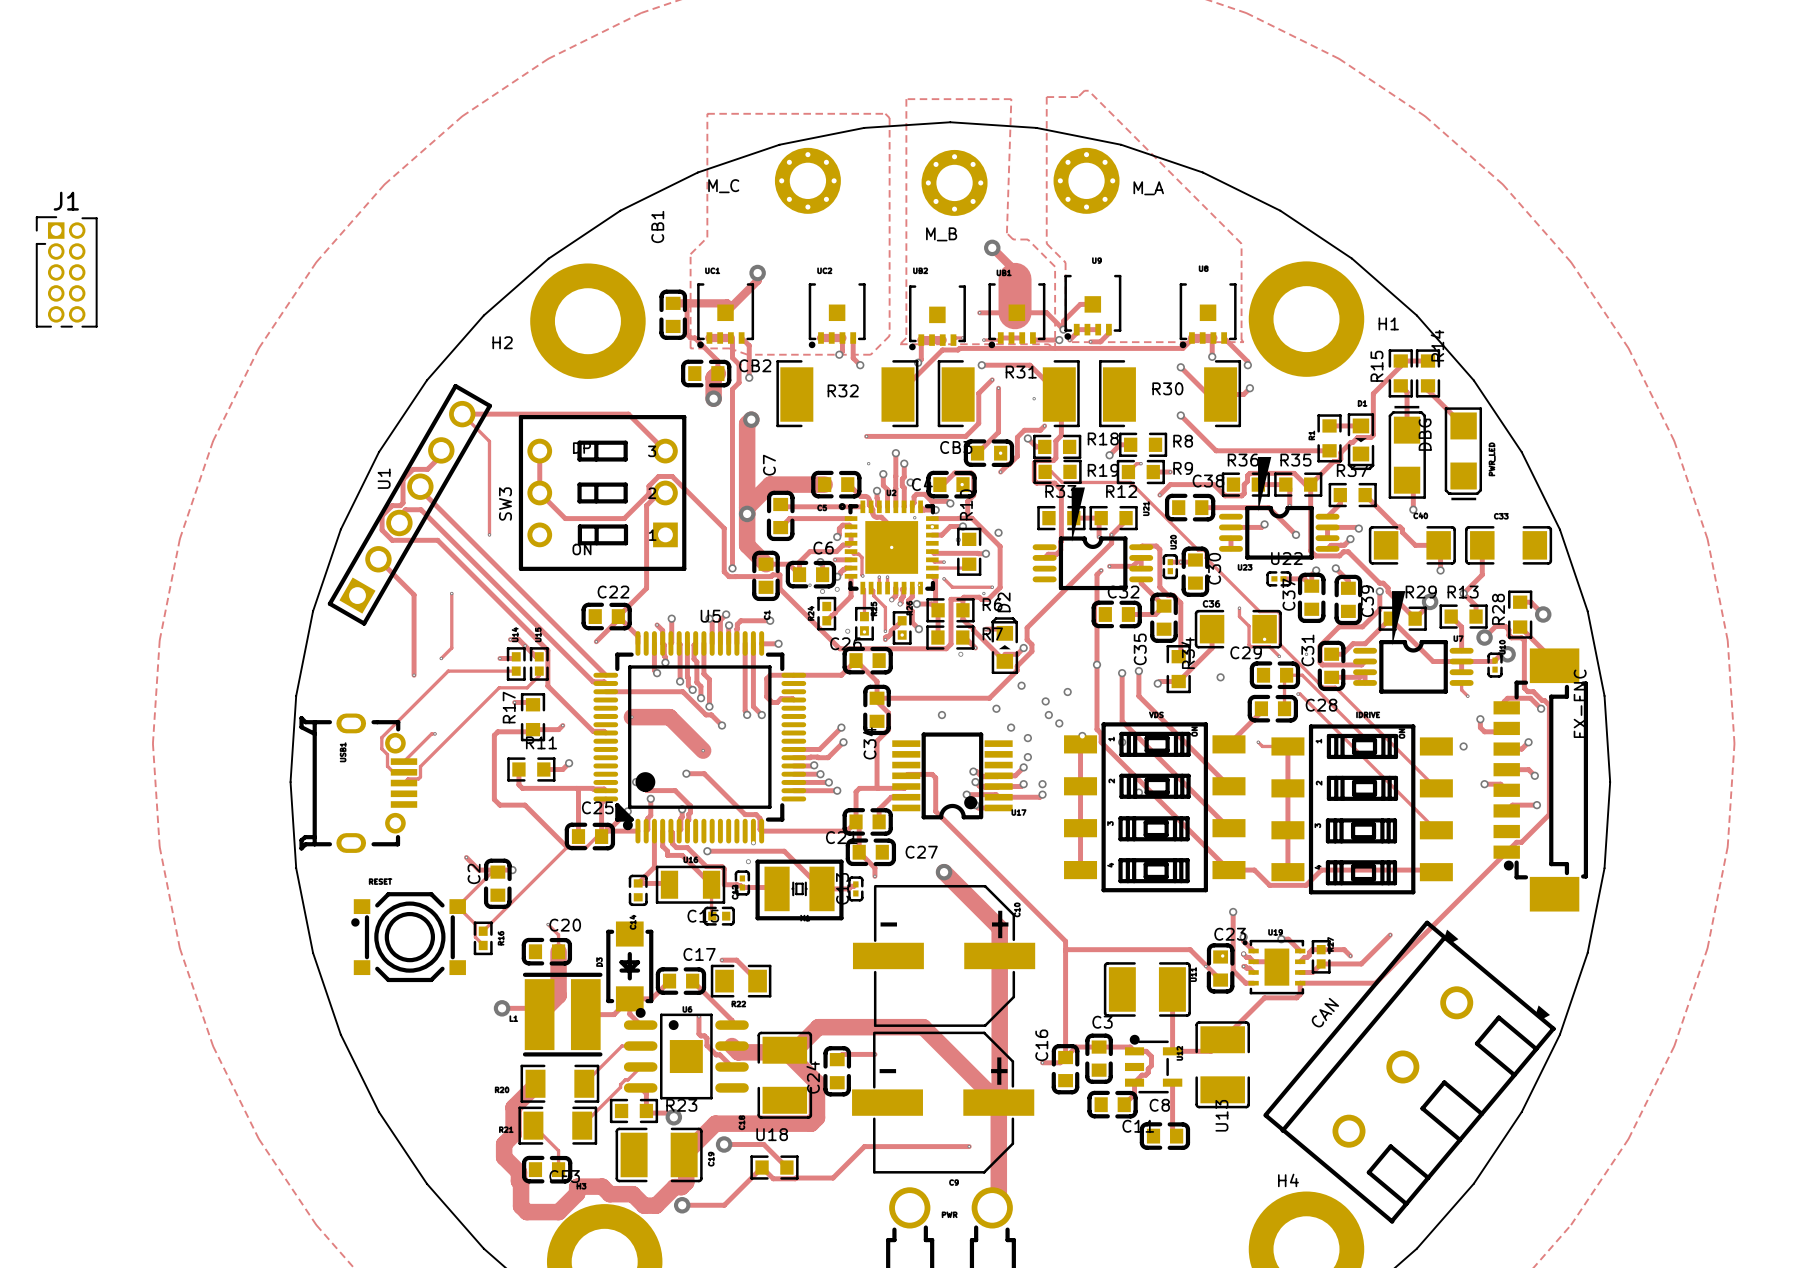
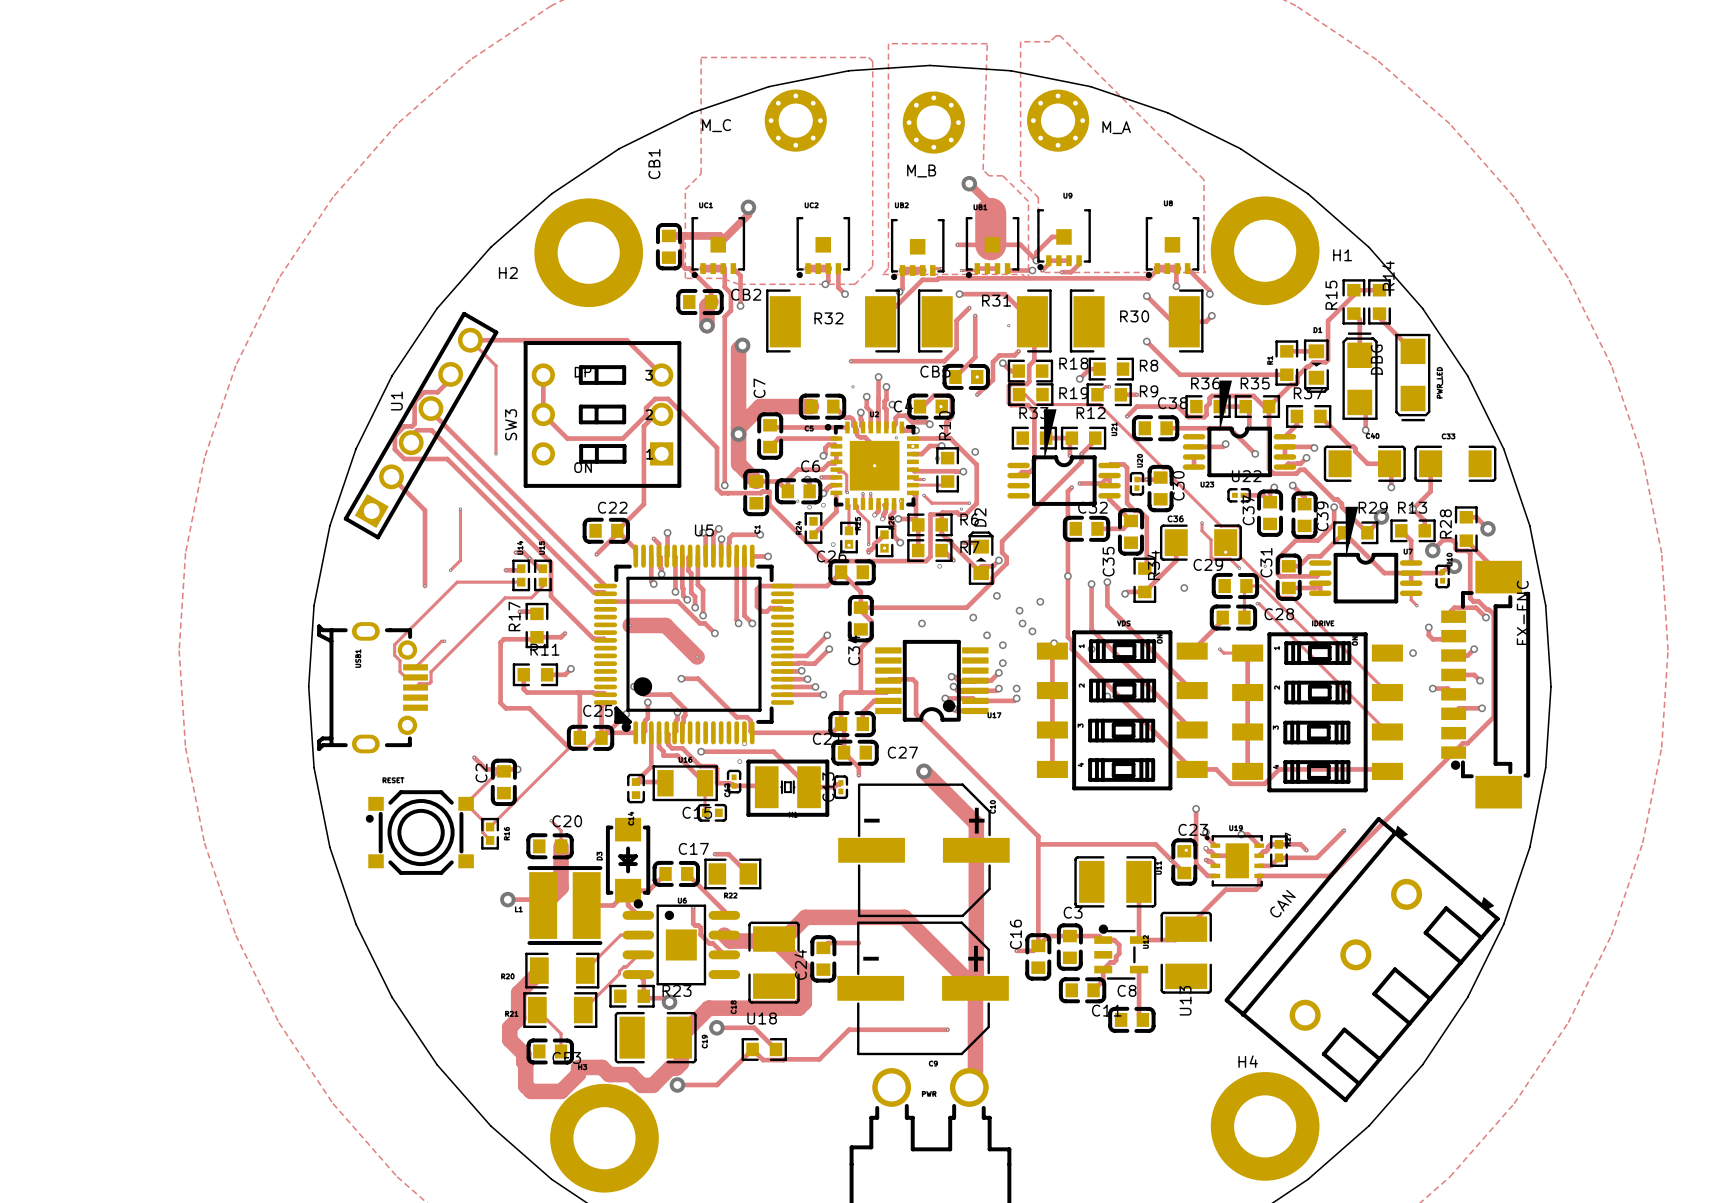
J1: (66, 271) -> none

